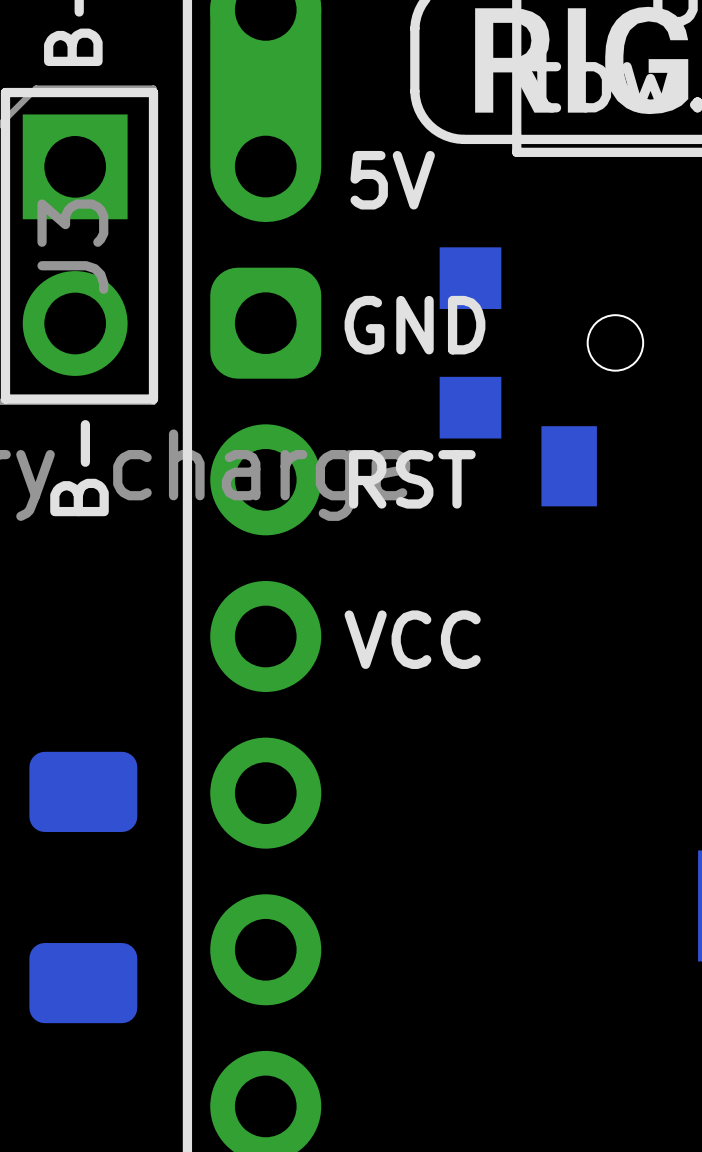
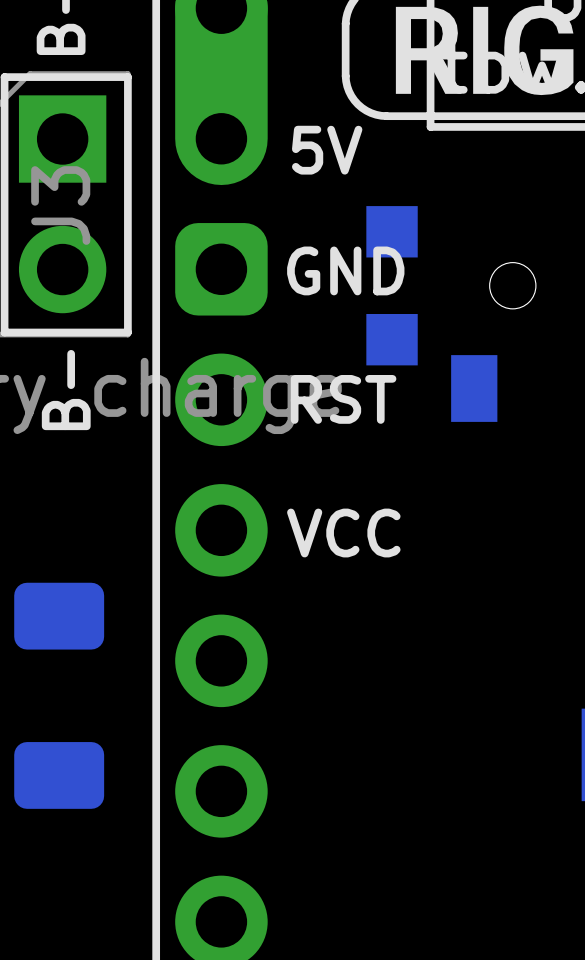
part position: (83, 887) -> (59, 695)

